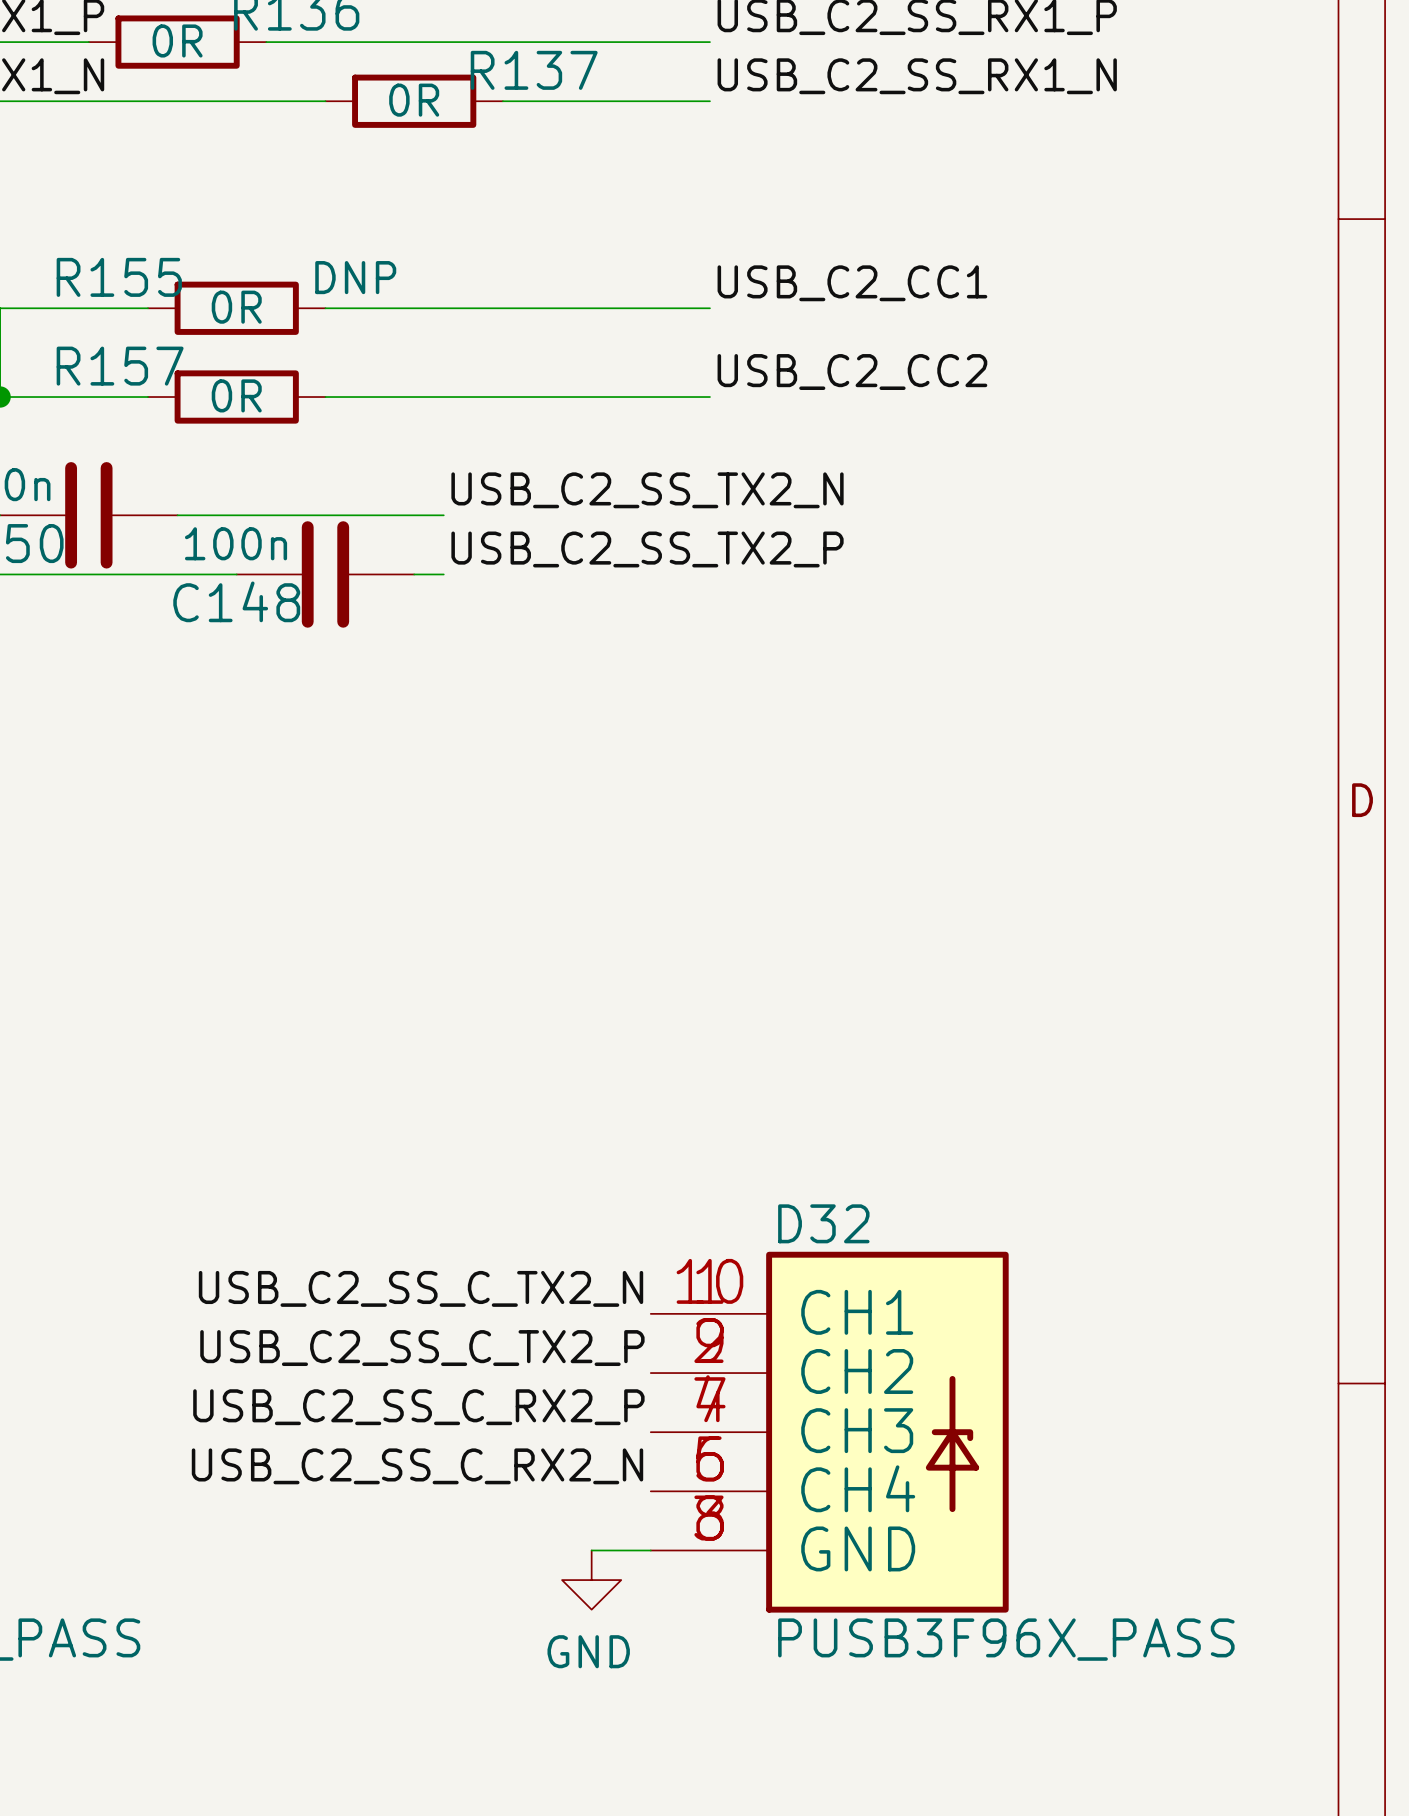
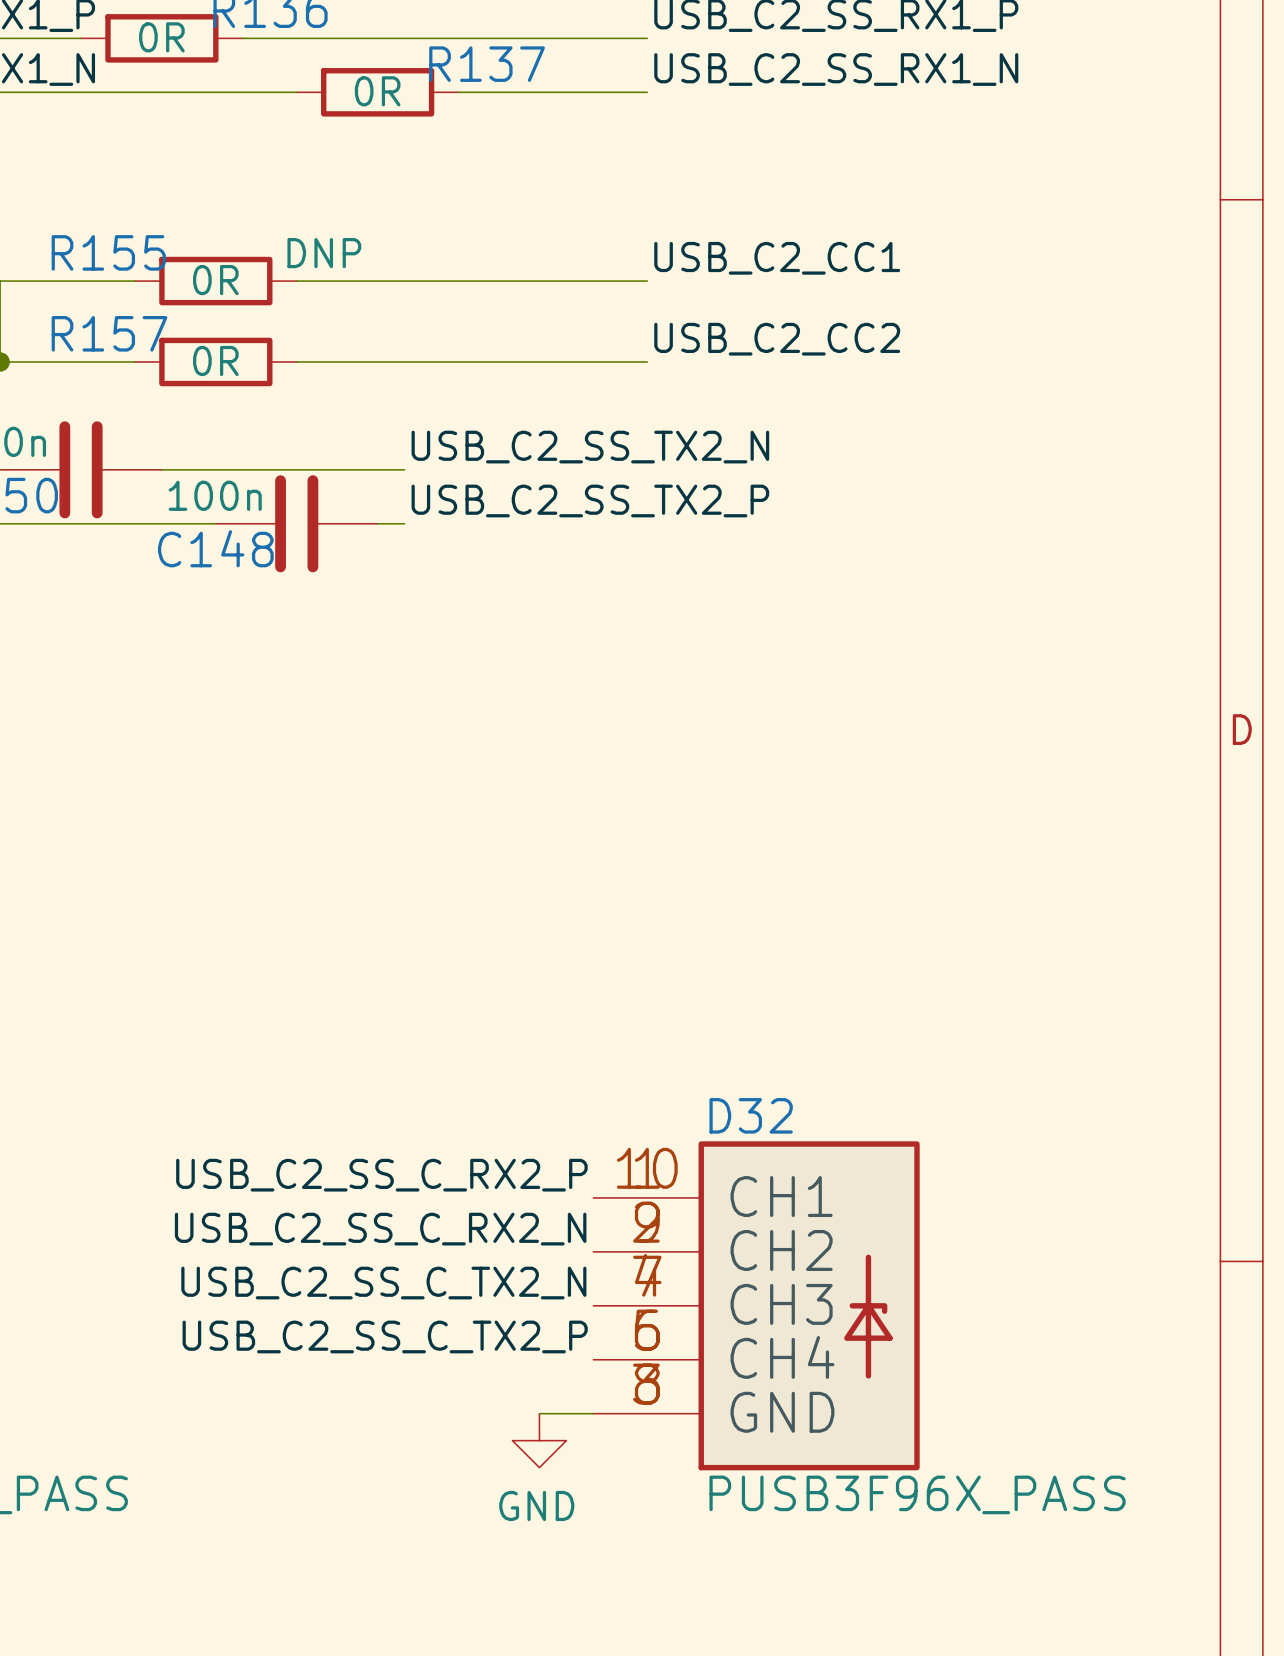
label: USB_C2_SS_C_TX2_N (421, 1288) -> USB_C2_SS_C_RX2_P (381, 1175)
label: USB_C2_SS_C_TX2_P (422, 1348) -> USB_C2_SS_C_RX2_N (380, 1229)
label: USB_C2_SS_C_RX2_P (418, 1407) -> USB_C2_SS_C_TX2_N (383, 1283)
label: USB_C2_SS_C_RX2_N (417, 1466) -> USB_C2_SS_C_TX2_P (385, 1336)

